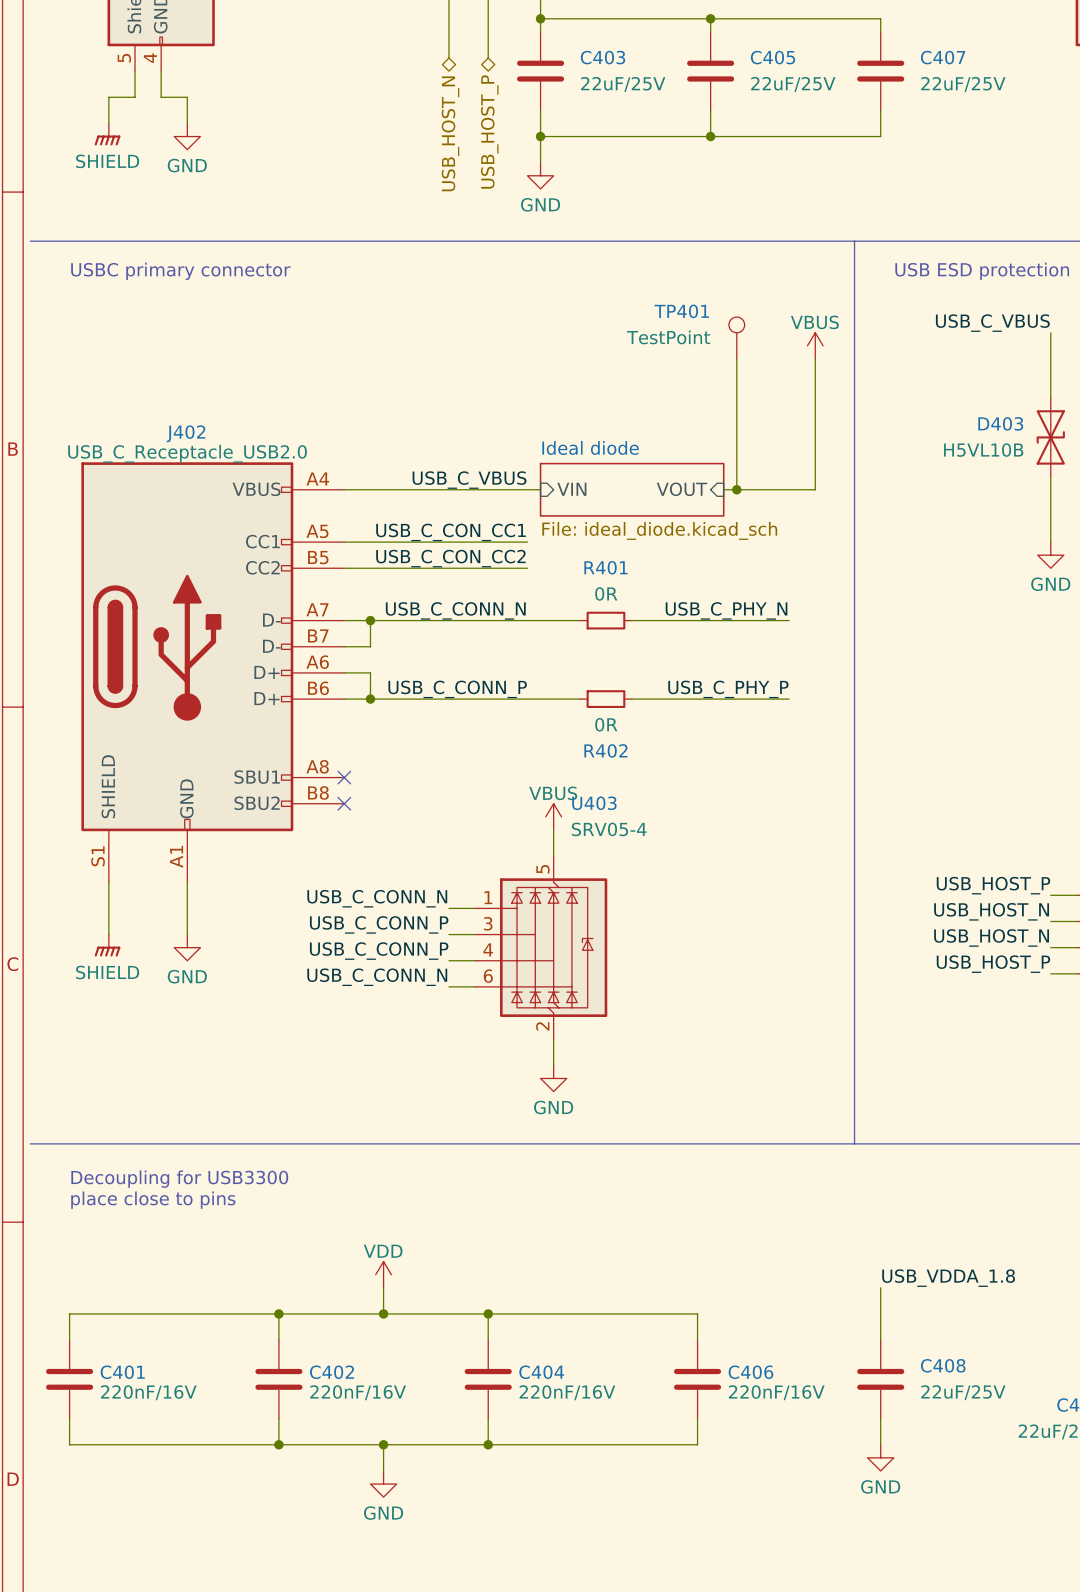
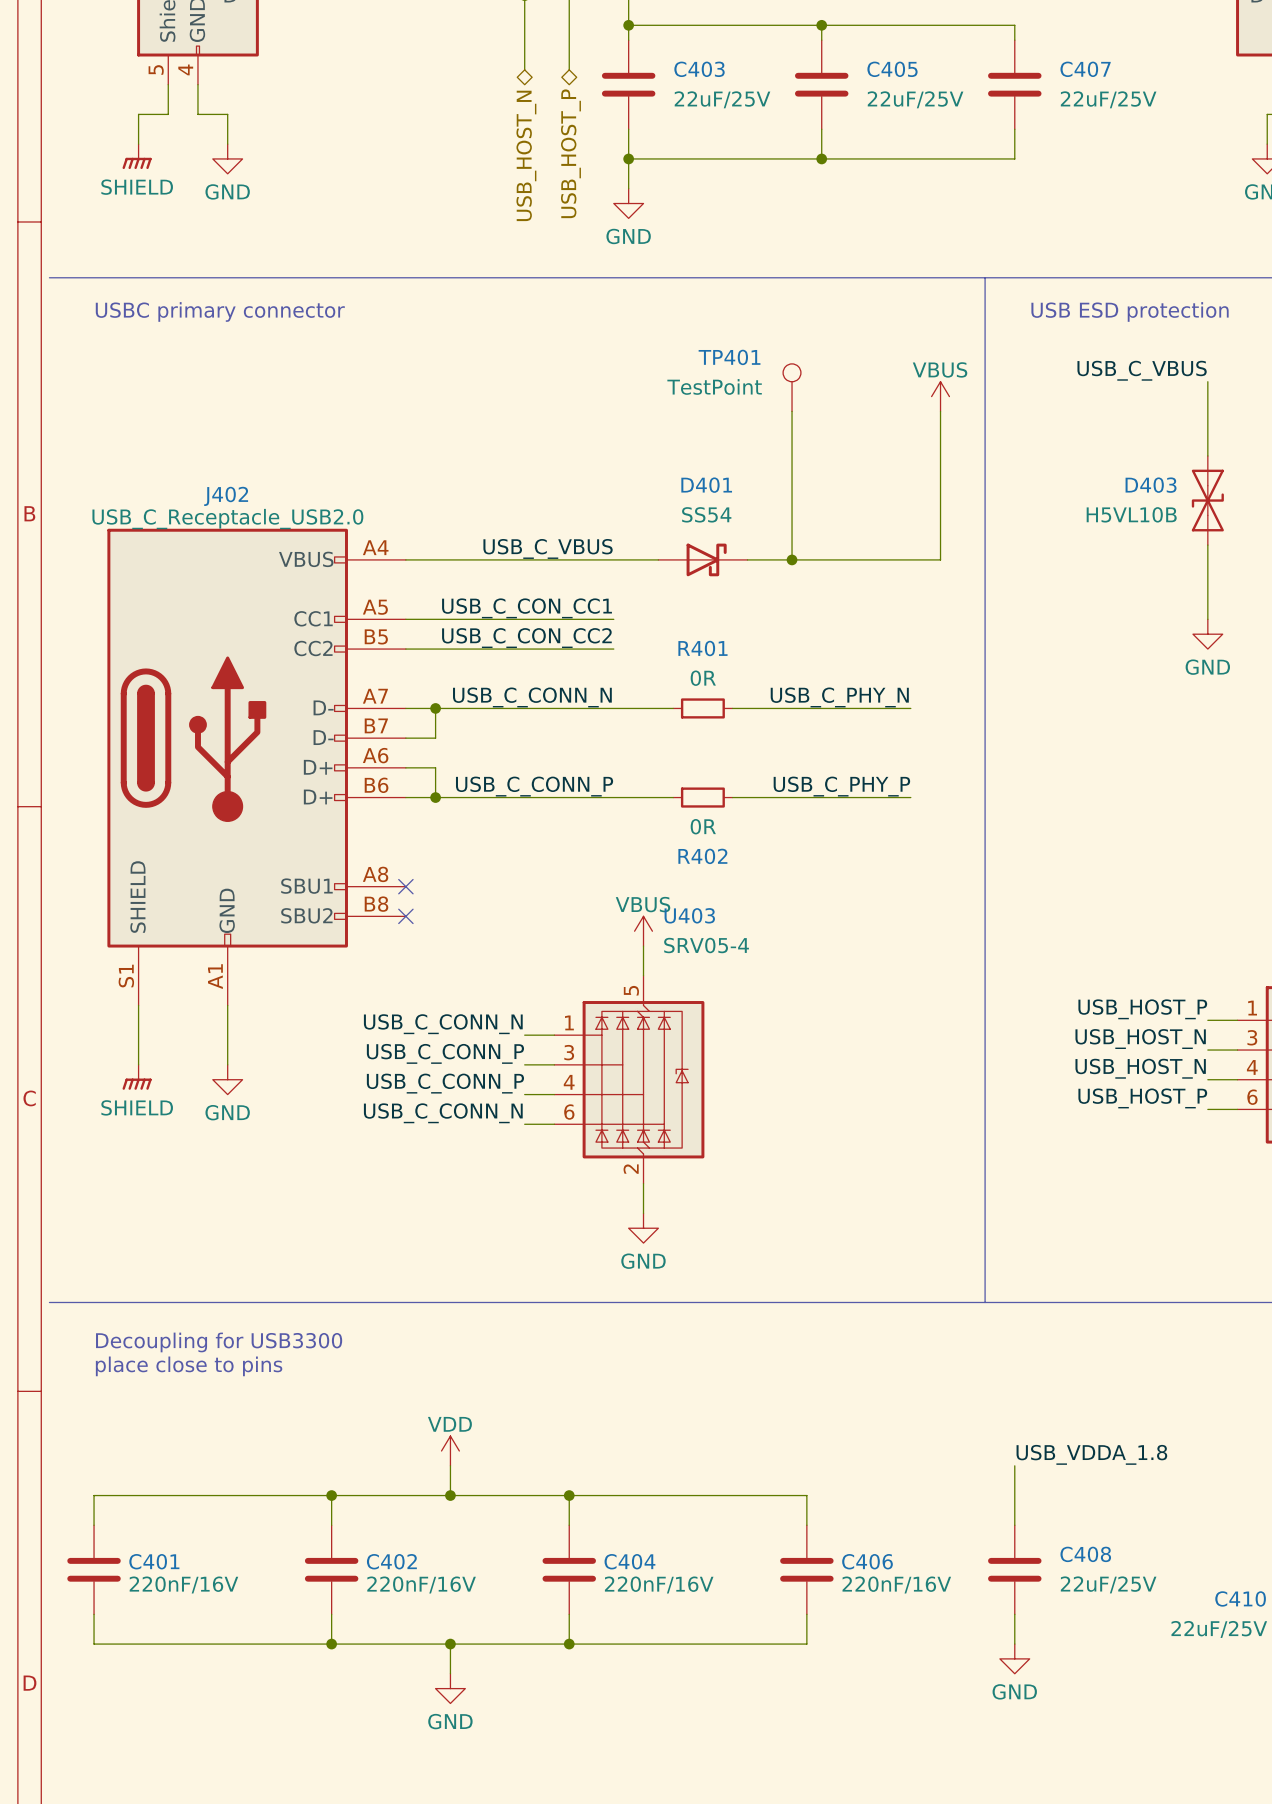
TP401 position: (736, 338) -> (792, 387)
wire: (736, 358) (736, 489) -> (792, 411) (792, 559)
wire: none -> (628, 559) (658, 559)
sheet pin: VIN (571, 489) -> none
D401: none -> SS54 (702, 559)
sheet Ideal diode: File: ideal_diode.kicad_sch (632, 489) -> none
wire: none -> (747, 559) (836, 559)
sheet pin: VOUT (681, 489) -> none
junction position: (736, 489) -> (792, 559)

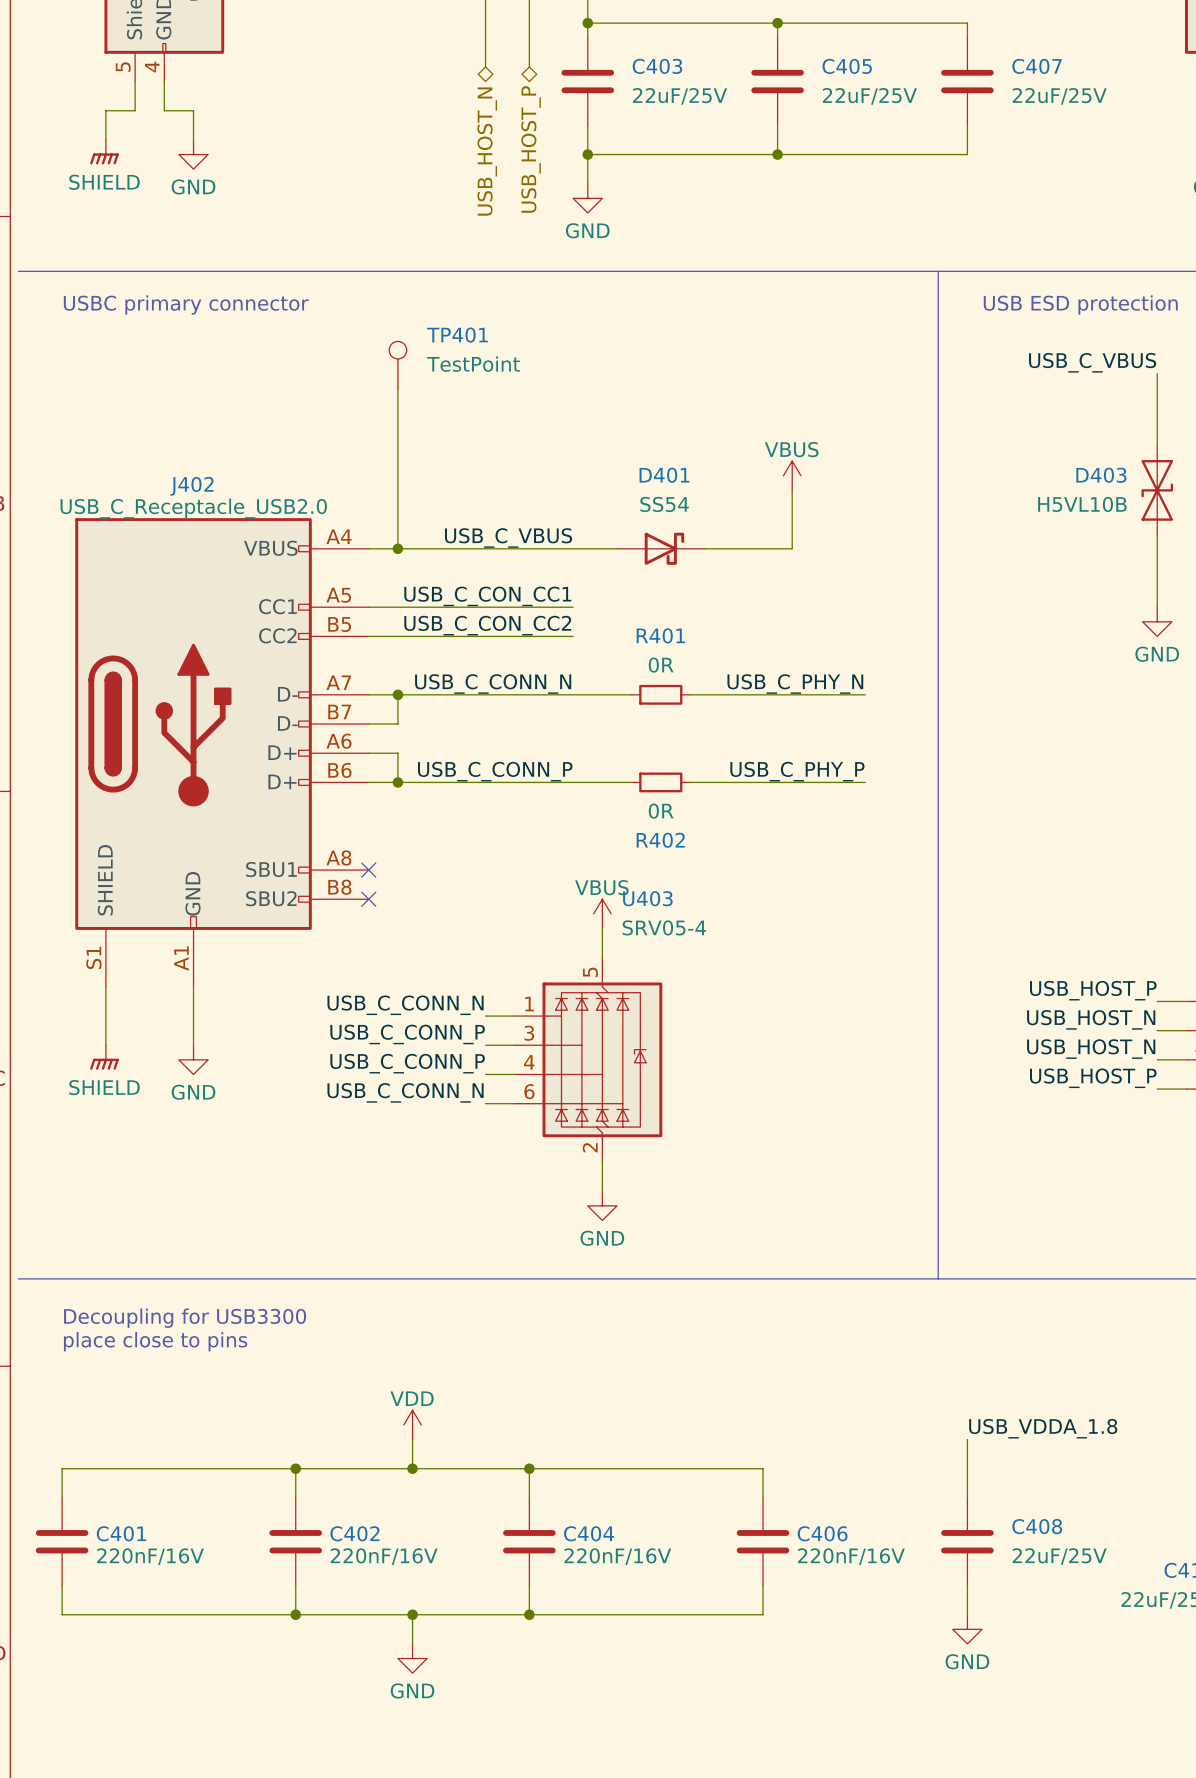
TP401 name position: TP401 (729, 357) -> TP401 (457, 335)
TP401 value position: TestPoint (714, 386) -> TestPoint (473, 364)
TP401 position: (792, 387) -> (397, 364)
wire: none -> (397, 388) (397, 548)
power symbol position: VBUS (940, 396) -> VBUS (792, 475)
wire: (792, 411) (792, 559) -> none
wire: (940, 411) (940, 559) (836, 559) -> (792, 490) (792, 548)
junction: none -> (397, 548)
junction: (792, 559) -> none

